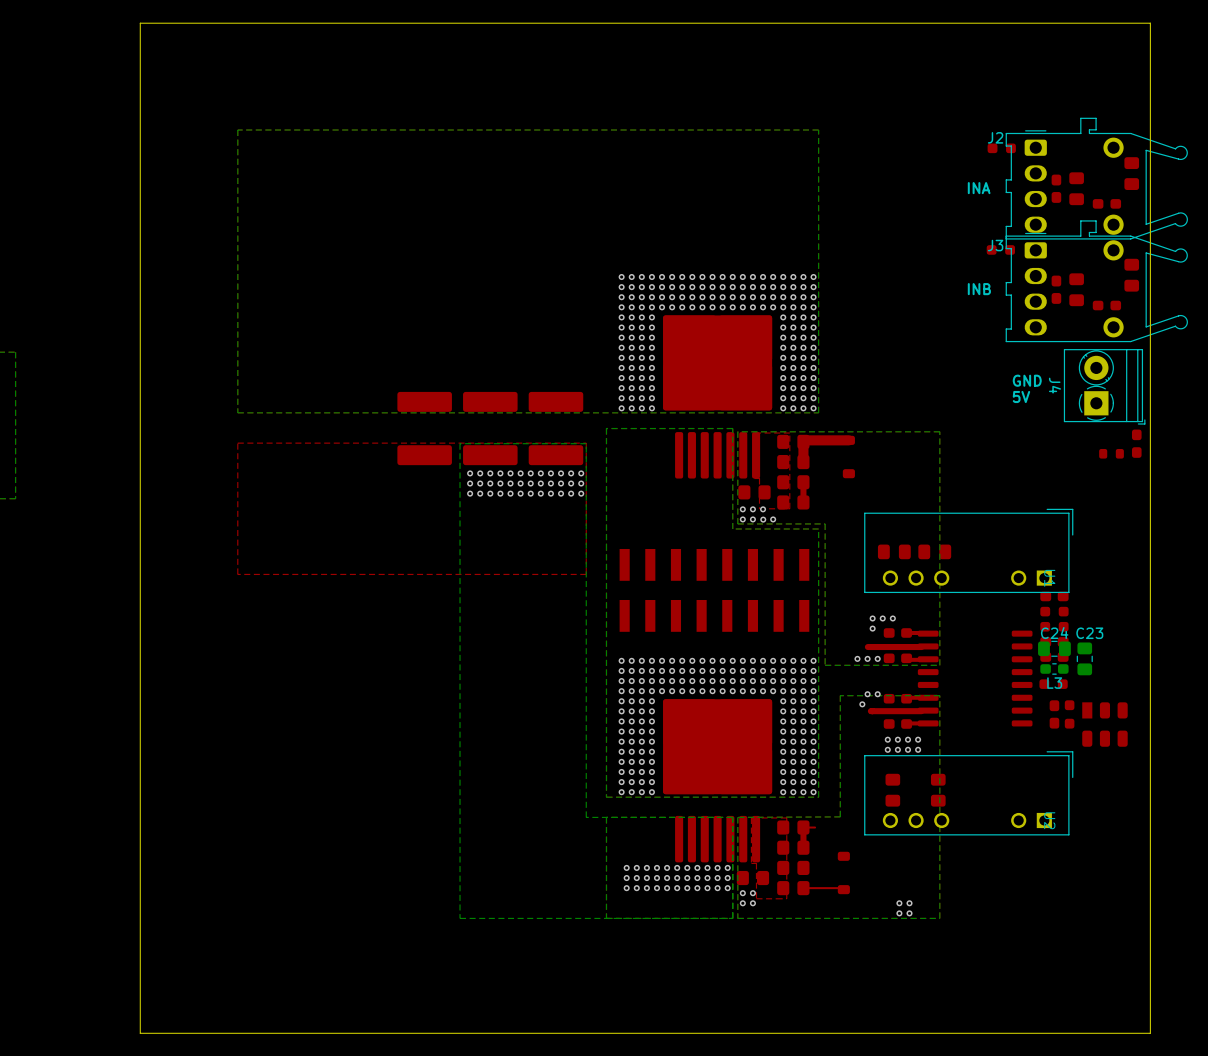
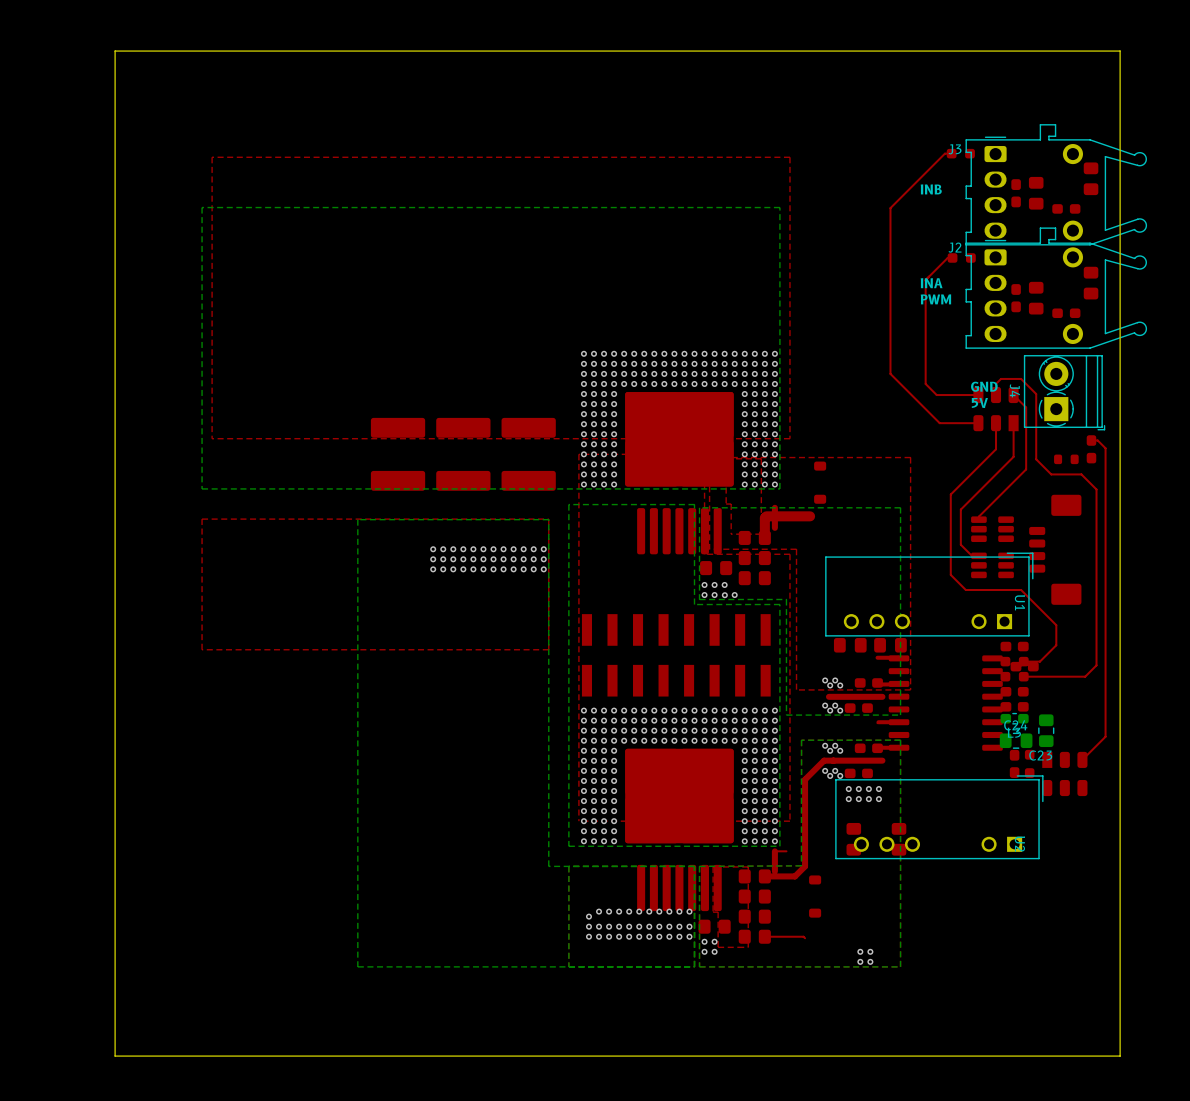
top track: none -> (951, 153) (944, 153) (890, 208) (890, 373) (939, 423) (978, 423)
bottom zone outline: (818, 130) (237, 130) (237, 412) (818, 412) (818, 130) -> (779, 207) (202, 207) (202, 488) (779, 488) (779, 207)
part position: (1001, 148) -> (960, 153)
part position: (1131, 173) -> (1091, 178)
J2 position: (1096, 178) -> (1056, 288)
text position: INA (979, 188) -> INA (931, 283)
part position: (1056, 188) -> (1016, 193)
part position: (1076, 188) -> (1036, 193)
part position: (1106, 203) -> (1066, 208)
top track: none -> (952, 257) (947, 257) (925, 280)
part position: (1000, 249) -> (961, 257)
top track: none -> (925, 280) (925, 383) (936, 395) (978, 395)
text: none -> PWM (935, 299)
part position: (1131, 275) -> (1091, 283)
via: (621, 277) -> none
via: (631, 277) -> none
via: (641, 277) -> none
via: (651, 277) -> none
via: (662, 277) -> none
via: (672, 277) -> none
via: (682, 277) -> none
via: (692, 277) -> none
via: (702, 277) -> none
via: (712, 277) -> none
via: (722, 277) -> none
via: (732, 277) -> none
via: (742, 277) -> none
via: (752, 277) -> none
via: (763, 277) -> none
via: (773, 277) -> none
via: (783, 277) -> none
via: (793, 277) -> none
via: (803, 277) -> none
via: (813, 277) -> none
J3 position: (1096, 281) -> (1056, 184)
via: (621, 287) -> none
via: (631, 287) -> none
via: (641, 287) -> none
via: (651, 287) -> none
via: (662, 287) -> none
via: (672, 287) -> none
via: (682, 287) -> none
via: (692, 287) -> none
via: (702, 287) -> none
via: (712, 287) -> none
via: (722, 287) -> none
via: (732, 287) -> none
via: (742, 287) -> none
via: (752, 287) -> none
via: (763, 287) -> none
via: (773, 287) -> none
via: (783, 287) -> none
via: (793, 287) -> none
via: (803, 287) -> none
via: (813, 287) -> none
text position: INB (979, 289) -> INB (931, 189)
part position: (1056, 289) -> (1016, 298)
part position: (1076, 289) -> (1036, 298)
via: (621, 297) -> none
via: (631, 297) -> none
via: (641, 297) -> none
via: (651, 297) -> none
via: (662, 297) -> none
via: (672, 297) -> none
via: (682, 297) -> none
via: (692, 297) -> none
via: (702, 297) -> none
via: (712, 297) -> none
via: (722, 297) -> none
via: (732, 297) -> none
via: (742, 297) -> none
via: (752, 297) -> none
via: (763, 297) -> none
via: (773, 297) -> none
via: (783, 297) -> none
via: (793, 297) -> none
via: (803, 297) -> none
via: (813, 297) -> none
part position: (1106, 305) -> (1066, 313)
via: (621, 307) -> none
via: (631, 307) -> none
via: (641, 307) -> none
via: (651, 307) -> none
via: (662, 307) -> none
via: (672, 307) -> none
via: (682, 307) -> none
via: (692, 307) -> none
via: (702, 307) -> none
via: (712, 307) -> none
via: (722, 307) -> none
via: (732, 307) -> none
via: (742, 307) -> none
via: (752, 307) -> none
via: (763, 307) -> none
via: (773, 307) -> none
via: (783, 307) -> none
via: (793, 307) -> none
via: (803, 307) -> none
via: (813, 307) -> none
via: (621, 317) -> none
via: (631, 317) -> none
via: (641, 317) -> none
via: (651, 317) -> none
via: (783, 317) -> none
via: (793, 317) -> none
via: (803, 317) -> none
via: (813, 317) -> none
via: none -> (583, 353)
via: none -> (634, 353)
via: none -> (644, 353)
via: none -> (654, 353)
via: none -> (664, 353)
via: none -> (674, 353)
via: none -> (684, 353)
via: none -> (694, 353)
via: none -> (704, 353)
via: none -> (714, 353)
via: none -> (724, 353)
via: none -> (734, 353)
via: none -> (744, 353)
via: (813, 327) -> none
via: none -> (583, 363)
via: none -> (634, 363)
via: none -> (644, 363)
via: none -> (654, 363)
via: none -> (664, 363)
via: none -> (674, 363)
via: none -> (684, 363)
via: none -> (694, 363)
via: none -> (704, 363)
via: none -> (714, 363)
via: none -> (724, 363)
via: none -> (734, 363)
via: none -> (744, 363)
via: (813, 337) -> none
via: none -> (583, 373)
via: none -> (634, 373)
via: none -> (644, 373)
via: none -> (654, 373)
via: none -> (664, 373)
via: none -> (674, 373)
via: none -> (684, 373)
via: none -> (694, 373)
via: none -> (704, 373)
via: none -> (714, 373)
via: none -> (724, 373)
via: none -> (734, 373)
via: none -> (744, 373)
via: (813, 347) -> none
via: none -> (583, 383)
via: none -> (634, 383)
via: none -> (644, 383)
via: none -> (654, 383)
via: none -> (664, 383)
via: none -> (674, 383)
via: none -> (684, 383)
via: none -> (694, 383)
via: none -> (704, 383)
via: none -> (714, 383)
via: none -> (724, 383)
via: none -> (734, 383)
via: none -> (744, 383)
via: (813, 357) -> none
via: none -> (583, 394)
via: (651, 367) -> none
via: none -> (744, 394)
via: (813, 367) -> none
top track: none -> (996, 395) (996, 383) (1001, 378) (1021, 378) (1036, 394) (1036, 459) (1051, 474) (1081, 474) (1096, 489) (1096, 665) (1085, 676) (1023, 676)
top track: none -> (1013, 395) (1026, 407) (1026, 469) (978, 516) (978, 519) (983, 519)
via: none -> (583, 404)
via: (651, 378) -> none
via: none -> (744, 404)
via: (813, 378) -> none
text position: GND (1027, 380) -> GND (984, 386)
part: none -> (996, 409)
J4 position: (1104, 386) -> (1064, 392)
via: none -> (583, 414)
via: (651, 388) -> none
via: none -> (744, 414)
via: (813, 388) -> none
part position: (717, 396) -> (679, 473)
text position: 5V (1021, 396) -> 5V (979, 402)
top track: none -> (996, 423) (996, 449) (950, 494) (950, 574) (965, 590) (1021, 590) (1056, 625) (1056, 645) (1039, 661) (1023, 661)
top track: none -> (1013, 423) (1013, 456) (960, 509) (960, 544) (971, 555) (983, 555)
via: none -> (583, 424)
via: (651, 398) -> none
via: none -> (744, 424)
via: (813, 398) -> none
via: none -> (583, 434)
via: (651, 408) -> none
via: none -> (744, 434)
via: (813, 408) -> none
top track: none -> (1091, 440) (1097, 440) (1105, 448) (1105, 736) (1082, 759)
via: none -> (583, 444)
via: none -> (594, 444)
via: none -> (604, 444)
via: none -> (614, 444)
via: none -> (744, 444)
via: none -> (754, 444)
via: none -> (764, 444)
via: none -> (774, 444)
via: none -> (583, 454)
via: none -> (594, 454)
via: none -> (604, 454)
via: none -> (614, 454)
bottom zone outline: (732, 428) (732, 528) (818, 528) (818, 797) (606, 797) (606, 428) (732, 428) -> (694, 504) (694, 604) (779, 604) (779, 846) (568, 846) (568, 504) (694, 504)
via: none -> (744, 454)
via: none -> (754, 454)
via: none -> (764, 454)
via: none -> (774, 454)
bottom zone outline: (939, 431) (939, 665) (825, 665) (825, 523) (737, 523) (737, 431) (939, 431) -> (900, 507) (900, 715) (786, 715) (786, 599) (699, 599) (699, 507) (900, 507)
via: none -> (583, 464)
via: none -> (594, 464)
via: none -> (604, 464)
via: none -> (614, 464)
via: none -> (744, 464)
via: none -> (754, 464)
via: none -> (764, 464)
via: none -> (774, 464)
top track: (848, 440) (804, 440) (803, 462) -> (810, 516) (766, 516) (764, 537)
part: (793, 441) -> none
top zone outline: (586, 443) (237, 443) (237, 574) (586, 574) (586, 443) -> (548, 519) (202, 519) (202, 649) (548, 649) (548, 519)
bottom zone outline: (586, 443) (586, 817) (732, 817) (732, 918) (460, 918) (460, 443) (586, 443) -> (548, 519) (548, 866) (694, 866) (694, 966) (357, 966) (357, 519) (548, 519)
part position: (1136, 443) -> (1091, 449)
via: none -> (583, 474)
via: none -> (594, 474)
via: none -> (604, 474)
via: none -> (614, 474)
via: none -> (744, 474)
via: none -> (754, 474)
via: none -> (764, 474)
via: none -> (774, 474)
part position: (1111, 453) -> (1066, 459)
via: none -> (583, 484)
via: none -> (594, 484)
via: none -> (604, 484)
via: none -> (614, 484)
via: none -> (744, 484)
via: none -> (754, 484)
via: none -> (764, 484)
via: none -> (774, 484)
part: (793, 462) -> none
via: (470, 473) -> none
via: (480, 473) -> none
via: (490, 473) -> none
via: (500, 473) -> none
via: (510, 473) -> none
via: (520, 473) -> none
via: (530, 473) -> none
via: (540, 473) -> none
via: (550, 473) -> none
via: (561, 473) -> none
via: (571, 473) -> none
via: (581, 473) -> none
part: (793, 482) -> none
via: (470, 483) -> none
via: (480, 483) -> none
via: (490, 483) -> none
via: (500, 483) -> none
via: (510, 483) -> none
via: (520, 483) -> none
via: (530, 483) -> none
via: (540, 483) -> none
via: (550, 483) -> none
via: (561, 483) -> none
via: (571, 483) -> none
via: (581, 483) -> none
part: (754, 492) -> none
via: (470, 493) -> none
via: (480, 493) -> none
via: (490, 493) -> none
via: (500, 493) -> none
via: (510, 493) -> none
via: (520, 493) -> none
via: (530, 493) -> none
via: (540, 493) -> none
via: (550, 493) -> none
via: (561, 493) -> none
via: (571, 493) -> none
via: (581, 493) -> none
part position: (793, 502) -> (754, 537)
part: none -> (992, 529)
via: (742, 509) -> none
via: (752, 509) -> none
via: (763, 509) -> none
via: (742, 519) -> none
via: (752, 519) -> none
via: (763, 519) -> none
via: (773, 519) -> none
via: none -> (433, 549)
via: none -> (443, 549)
via: none -> (453, 549)
via: none -> (463, 549)
via: none -> (473, 549)
via: none -> (483, 549)
via: none -> (493, 549)
via: none -> (503, 549)
via: none -> (513, 549)
via: none -> (523, 549)
via: none -> (533, 549)
via: none -> (543, 549)
part: none -> (1055, 549)
part: none -> (754, 558)
via: none -> (433, 559)
via: none -> (443, 559)
via: none -> (453, 559)
via: none -> (463, 559)
via: none -> (473, 559)
via: none -> (483, 559)
via: none -> (493, 559)
via: none -> (503, 559)
via: none -> (513, 559)
via: none -> (523, 559)
via: none -> (533, 559)
via: none -> (543, 559)
part: none -> (992, 565)
part: none -> (716, 568)
via: none -> (433, 569)
via: none -> (443, 569)
via: none -> (453, 569)
via: none -> (463, 569)
via: none -> (473, 569)
via: none -> (483, 569)
via: none -> (493, 569)
via: none -> (503, 569)
via: none -> (513, 569)
via: none -> (523, 569)
via: none -> (533, 569)
via: none -> (543, 569)
U1 position: (968, 550) -> (929, 594)
part: (894, 551) -> none
part: (934, 551) -> none
part: none -> (754, 578)
via: none -> (704, 584)
via: none -> (714, 584)
via: none -> (724, 584)
via: none -> (704, 595)
via: none -> (714, 595)
via: none -> (734, 595)
via: none -> (724, 595)
part position: (714, 590) -> (676, 655)
part: (1054, 596) -> none
part: (1054, 611) -> none
via: (872, 618) -> none
via: (882, 618) -> none
via: (892, 618) -> none
part: none -> (850, 645)
part: none -> (890, 645)
part: none -> (1014, 646)
part: (1054, 626) -> none
via: (872, 628) -> none
part: (897, 632) -> none
C23 name position: C23 (1089, 633) -> C23 (1040, 755)
part: none -> (1014, 661)
top track: (921, 647) (867, 647) -> (882, 696) (828, 696)
C24 position: (1054, 648) -> (1016, 740)
part: none -> (1014, 676)
via: none -> (825, 680)
via: none -> (835, 680)
part position: (1054, 657) -> (1014, 691)
via: (857, 658) -> none
via: (867, 658) -> none
via: (877, 658) -> none
C23 position: (1084, 658) -> (1046, 730)
via: (621, 660) -> none
via: (631, 660) -> none
via: (641, 660) -> none
via: (651, 660) -> none
via: (662, 660) -> none
via: (672, 660) -> none
via: (682, 660) -> none
via: (692, 660) -> none
via: (702, 660) -> none
via: (712, 660) -> none
via: (722, 660) -> none
via: (732, 660) -> none
via: (742, 660) -> none
via: (752, 660) -> none
via: (763, 660) -> none
via: (773, 660) -> none
via: (783, 660) -> none
via: (793, 660) -> none
via: (803, 660) -> none
via: (813, 660) -> none
via: none -> (830, 685)
via: none -> (840, 685)
L3 position: (1054, 668) -> (1014, 718)
via: (621, 670) -> none
via: (631, 670) -> none
via: (641, 670) -> none
via: (651, 670) -> none
via: (662, 670) -> none
via: (672, 670) -> none
via: (682, 670) -> none
via: (692, 670) -> none
via: (702, 670) -> none
via: (712, 670) -> none
via: (722, 670) -> none
via: (732, 670) -> none
via: (742, 670) -> none
via: (752, 670) -> none
via: (763, 670) -> none
via: (773, 670) -> none
via: (783, 670) -> none
via: (793, 670) -> none
via: (803, 670) -> none
via: (813, 670) -> none
part footprint: [1039, 679, 1068, 689] -> [1000, 702, 1029, 712]
via: (621, 681) -> none
via: (631, 681) -> none
via: (641, 681) -> none
via: (651, 681) -> none
via: (662, 681) -> none
via: (672, 681) -> none
via: (682, 681) -> none
via: (692, 681) -> none
via: (702, 681) -> none
via: (712, 681) -> none
via: (722, 681) -> none
via: (732, 681) -> none
via: (742, 681) -> none
via: (752, 681) -> none
via: (763, 681) -> none
via: (773, 681) -> none
via: (783, 681) -> none
via: (793, 681) -> none
via: (803, 681) -> none
via: (813, 681) -> none
via: none -> (825, 705)
via: none -> (835, 705)
via: none -> (583, 710)
via: none -> (594, 710)
via: none -> (604, 710)
via: none -> (614, 710)
via: none -> (624, 710)
via: none -> (634, 710)
via: none -> (644, 710)
via: none -> (654, 710)
via: none -> (664, 710)
via: none -> (674, 710)
via: none -> (684, 710)
via: none -> (694, 710)
via: none -> (704, 710)
via: none -> (714, 710)
via: none -> (724, 710)
via: none -> (734, 710)
via: none -> (744, 710)
via: none -> (754, 710)
via: none -> (764, 710)
via: none -> (774, 710)
via: none -> (830, 710)
via: none -> (840, 710)
via: (621, 691) -> none
via: (631, 691) -> none
via: (641, 691) -> none
via: (651, 691) -> none
via: (662, 691) -> none
via: (672, 691) -> none
via: (682, 691) -> none
via: (692, 691) -> none
via: (702, 691) -> none
via: (712, 691) -> none
via: (722, 691) -> none
via: (732, 691) -> none
via: (742, 691) -> none
via: (752, 691) -> none
via: (763, 691) -> none
via: (773, 691) -> none
via: (783, 691) -> none
via: (793, 691) -> none
via: (803, 691) -> none
via: (813, 691) -> none
via: (867, 694) -> none
via: (877, 694) -> none
bottom zone outline: (939, 695) (939, 918) (737, 918) (737, 817) (840, 816) (840, 695) (939, 695) -> (900, 740) (900, 966) (699, 966) (699, 866) (801, 865) (801, 740) (900, 740)
via: none -> (583, 720)
via: none -> (594, 720)
via: none -> (604, 720)
via: none -> (614, 720)
via: none -> (624, 720)
via: none -> (634, 720)
via: none -> (644, 720)
via: none -> (654, 720)
via: none -> (664, 720)
via: none -> (674, 720)
via: none -> (684, 720)
via: none -> (694, 720)
via: none -> (704, 720)
via: none -> (714, 720)
via: none -> (724, 720)
via: none -> (734, 720)
via: none -> (744, 720)
via: none -> (754, 720)
via: none -> (764, 720)
via: none -> (774, 720)
part position: (897, 698) -> (858, 708)
via: (621, 701) -> none
via: (631, 701) -> none
via: (641, 701) -> none
via: (651, 701) -> none
via: (783, 701) -> none
via: (793, 701) -> none
via: (803, 701) -> none
via: (813, 701) -> none
via: (862, 704) -> none
via: none -> (583, 730)
via: none -> (594, 730)
via: none -> (604, 730)
via: none -> (614, 730)
via: none -> (624, 730)
via: none -> (634, 730)
via: none -> (644, 730)
via: none -> (654, 730)
via: none -> (664, 730)
via: none -> (674, 730)
via: none -> (684, 730)
via: none -> (694, 730)
via: none -> (704, 730)
via: none -> (714, 730)
via: none -> (724, 730)
via: none -> (734, 730)
via: none -> (744, 730)
via: none -> (754, 730)
via: none -> (764, 730)
via: none -> (774, 730)
via: (621, 711) -> none
via: (631, 711) -> none
via: (641, 711) -> none
via: (651, 711) -> none
via: (783, 711) -> none
via: (793, 711) -> none
via: (803, 711) -> none
via: (813, 711) -> none
top track: (921, 711) (870, 711) -> none
part: (1054, 714) -> none
part position: (1069, 714) -> (1029, 763)
via: none -> (583, 740)
via: none -> (594, 740)
via: none -> (604, 740)
via: none -> (614, 740)
via: none -> (624, 740)
via: none -> (634, 740)
via: none -> (644, 740)
via: none -> (654, 740)
via: none -> (664, 740)
via: none -> (674, 740)
via: none -> (684, 740)
via: none -> (694, 740)
via: none -> (704, 740)
via: none -> (714, 740)
via: none -> (724, 740)
via: none -> (734, 740)
via: none -> (744, 740)
via: none -> (754, 740)
via: none -> (764, 740)
via: none -> (774, 740)
via: (621, 721) -> none
via: (631, 721) -> none
via: (641, 721) -> none
via: (651, 721) -> none
via: (783, 721) -> none
via: (793, 721) -> none
via: (803, 721) -> none
via: (813, 721) -> none
via: none -> (825, 745)
via: none -> (835, 745)
part position: (1104, 724) -> (1064, 773)
via: none -> (583, 750)
via: none -> (594, 750)
via: none -> (604, 750)
via: none -> (614, 750)
via: none -> (744, 750)
via: none -> (754, 750)
via: none -> (764, 750)
via: none -> (774, 750)
via: none -> (830, 750)
via: none -> (840, 750)
via: (621, 731) -> none
via: (631, 731) -> none
via: (641, 731) -> none
via: (651, 731) -> none
via: (783, 731) -> none
via: (793, 731) -> none
via: (803, 731) -> none
via: (813, 731) -> none
via: none -> (583, 760)
via: none -> (594, 760)
via: none -> (604, 760)
via: none -> (614, 760)
via: none -> (744, 760)
via: none -> (754, 760)
via: none -> (764, 760)
via: none -> (774, 760)
top track: none -> (882, 760) (824, 760) (805, 779) (805, 866) (795, 876) (764, 876) (776, 876)
via: (887, 739) -> none
via: (897, 739) -> none
via: (907, 739) -> none
via: (918, 739) -> none
part: none -> (1014, 763)
via: (621, 741) -> none
via: (631, 741) -> none
via: (641, 741) -> none
via: (651, 741) -> none
via: (783, 741) -> none
via: (793, 741) -> none
via: (803, 741) -> none
via: (813, 741) -> none
via: none -> (583, 770)
via: none -> (594, 770)
via: none -> (604, 770)
via: none -> (614, 770)
via: none -> (744, 770)
via: none -> (754, 770)
via: none -> (764, 770)
via: none -> (774, 770)
via: none -> (825, 770)
via: none -> (835, 770)
part: none -> (858, 773)
via: (887, 749) -> none
via: (897, 749) -> none
via: (907, 749) -> none
via: (918, 749) -> none
via: (621, 751) -> none
via: (631, 751) -> none
via: (641, 751) -> none
via: (651, 751) -> none
via: (783, 751) -> none
via: (793, 751) -> none
via: (803, 751) -> none
via: (813, 751) -> none
via: none -> (830, 775)
via: none -> (840, 775)
via: none -> (583, 780)
via: none -> (594, 780)
via: none -> (604, 780)
via: none -> (614, 780)
via: none -> (744, 780)
via: none -> (754, 780)
via: none -> (764, 780)
via: none -> (774, 780)
via: (621, 761) -> none
via: (631, 761) -> none
via: (641, 761) -> none
via: (651, 761) -> none
via: (783, 761) -> none
via: (793, 761) -> none
via: (803, 761) -> none
via: (813, 761) -> none
via: none -> (848, 789)
via: none -> (858, 789)
via: none -> (868, 789)
via: none -> (878, 789)
via: none -> (583, 791)
via: none -> (594, 791)
via: none -> (604, 791)
via: none -> (614, 791)
via: none -> (744, 791)
via: none -> (754, 791)
via: none -> (764, 791)
via: none -> (774, 791)
via: (621, 771) -> none
via: (631, 771) -> none
via: (641, 771) -> none
via: (651, 771) -> none
via: (783, 771) -> none
via: (793, 771) -> none
via: (803, 771) -> none
via: (813, 771) -> none
via: none -> (848, 799)
via: none -> (858, 799)
via: none -> (868, 799)
via: none -> (878, 799)
via: none -> (583, 801)
via: none -> (594, 801)
via: none -> (604, 801)
via: none -> (614, 801)
via: none -> (744, 801)
via: none -> (754, 801)
via: none -> (764, 801)
via: none -> (774, 801)
part position: (717, 780) -> (679, 829)
via: (621, 782) -> none
via: (631, 782) -> none
via: (641, 782) -> none
via: (651, 782) -> none
via: (783, 782) -> none
via: (793, 782) -> none
via: (803, 782) -> none
via: (813, 782) -> none
via: none -> (583, 811)
via: none -> (594, 811)
via: none -> (604, 811)
via: none -> (614, 811)
via: none -> (744, 811)
via: none -> (754, 811)
via: none -> (764, 811)
via: none -> (774, 811)
part: (892, 790) -> none
part: (938, 790) -> none
via: (621, 792) -> none
via: (631, 792) -> none
via: (641, 792) -> none
via: (651, 792) -> none
via: (783, 792) -> none
via: (793, 792) -> none
via: (803, 792) -> none
via: (813, 792) -> none
via: none -> (583, 821)
via: none -> (594, 821)
via: none -> (604, 821)
via: none -> (614, 821)
via: none -> (744, 821)
via: none -> (754, 821)
via: none -> (764, 821)
via: none -> (774, 821)
via: none -> (583, 831)
via: none -> (594, 831)
via: none -> (604, 831)
via: none -> (614, 831)
via: none -> (744, 831)
via: none -> (754, 831)
via: none -> (764, 831)
via: none -> (774, 831)
part: none -> (853, 839)
part: none -> (899, 839)
bottom zone outline: (606, 817) (606, 918) -> (568, 866) (568, 966)
via: none -> (583, 841)
via: none -> (594, 841)
via: none -> (604, 841)
via: none -> (614, 841)
via: none -> (744, 841)
via: none -> (754, 841)
top zone outline: (786, 817) (751, 817) (751, 863) (756, 863) (756, 898) (786, 898) (786, 817) -> (748, 866) (713, 866) (713, 912) (718, 912) (718, 947) (748, 947) (748, 866)
via: none -> (764, 841)
via: none -> (774, 841)
part: (793, 827) -> none
part: (793, 847) -> none
part: none -> (754, 876)
via: (626, 867) -> none
via: (636, 867) -> none
via: (646, 867) -> none
via: (656, 867) -> none
via: (667, 867) -> none
via: (677, 867) -> none
via: (687, 867) -> none
via: (697, 867) -> none
via: (707, 867) -> none
via: (717, 867) -> none
via: (727, 867) -> none
part: (793, 867) -> none
part: none -> (754, 896)
via: (626, 878) -> none
via: (636, 878) -> none
via: (646, 878) -> none
via: (656, 878) -> none
via: (667, 878) -> none
via: (677, 878) -> none
via: (687, 878) -> none
via: (697, 878) -> none
via: (707, 878) -> none
via: (717, 878) -> none
via: (727, 878) -> none
part: (752, 878) -> none
via: (727, 888) -> none
part: (793, 888) -> none
top track: (843, 889) (803, 888) (804, 889) -> (805, 938) (764, 936) (766, 938)
via: none -> (588, 916)
via: (742, 893) -> none
via: (752, 893) -> none
part: none -> (754, 916)
via: none -> (588, 926)
via: none -> (599, 926)
via: none -> (609, 926)
via: none -> (619, 926)
via: none -> (629, 926)
via: none -> (639, 926)
via: none -> (649, 926)
via: none -> (659, 926)
via: none -> (669, 926)
via: none -> (679, 926)
via: none -> (689, 926)
part: none -> (714, 926)
via: (742, 903) -> none
via: (752, 903) -> none
via: (899, 903) -> none
via: (909, 903) -> none
via: none -> (588, 936)
via: none -> (599, 936)
via: none -> (609, 936)
via: none -> (619, 936)
via: none -> (629, 936)
via: none -> (639, 936)
via: none -> (649, 936)
via: none -> (659, 936)
via: none -> (669, 936)
via: none -> (679, 936)
via: none -> (689, 936)
part: none -> (754, 936)
via: (899, 913) -> none
via: (909, 913) -> none
via: none -> (704, 941)
via: none -> (714, 941)
via: none -> (704, 951)
via: none -> (714, 951)
via: none -> (860, 951)
via: none -> (870, 951)
via: none -> (860, 961)
via: none -> (870, 961)

